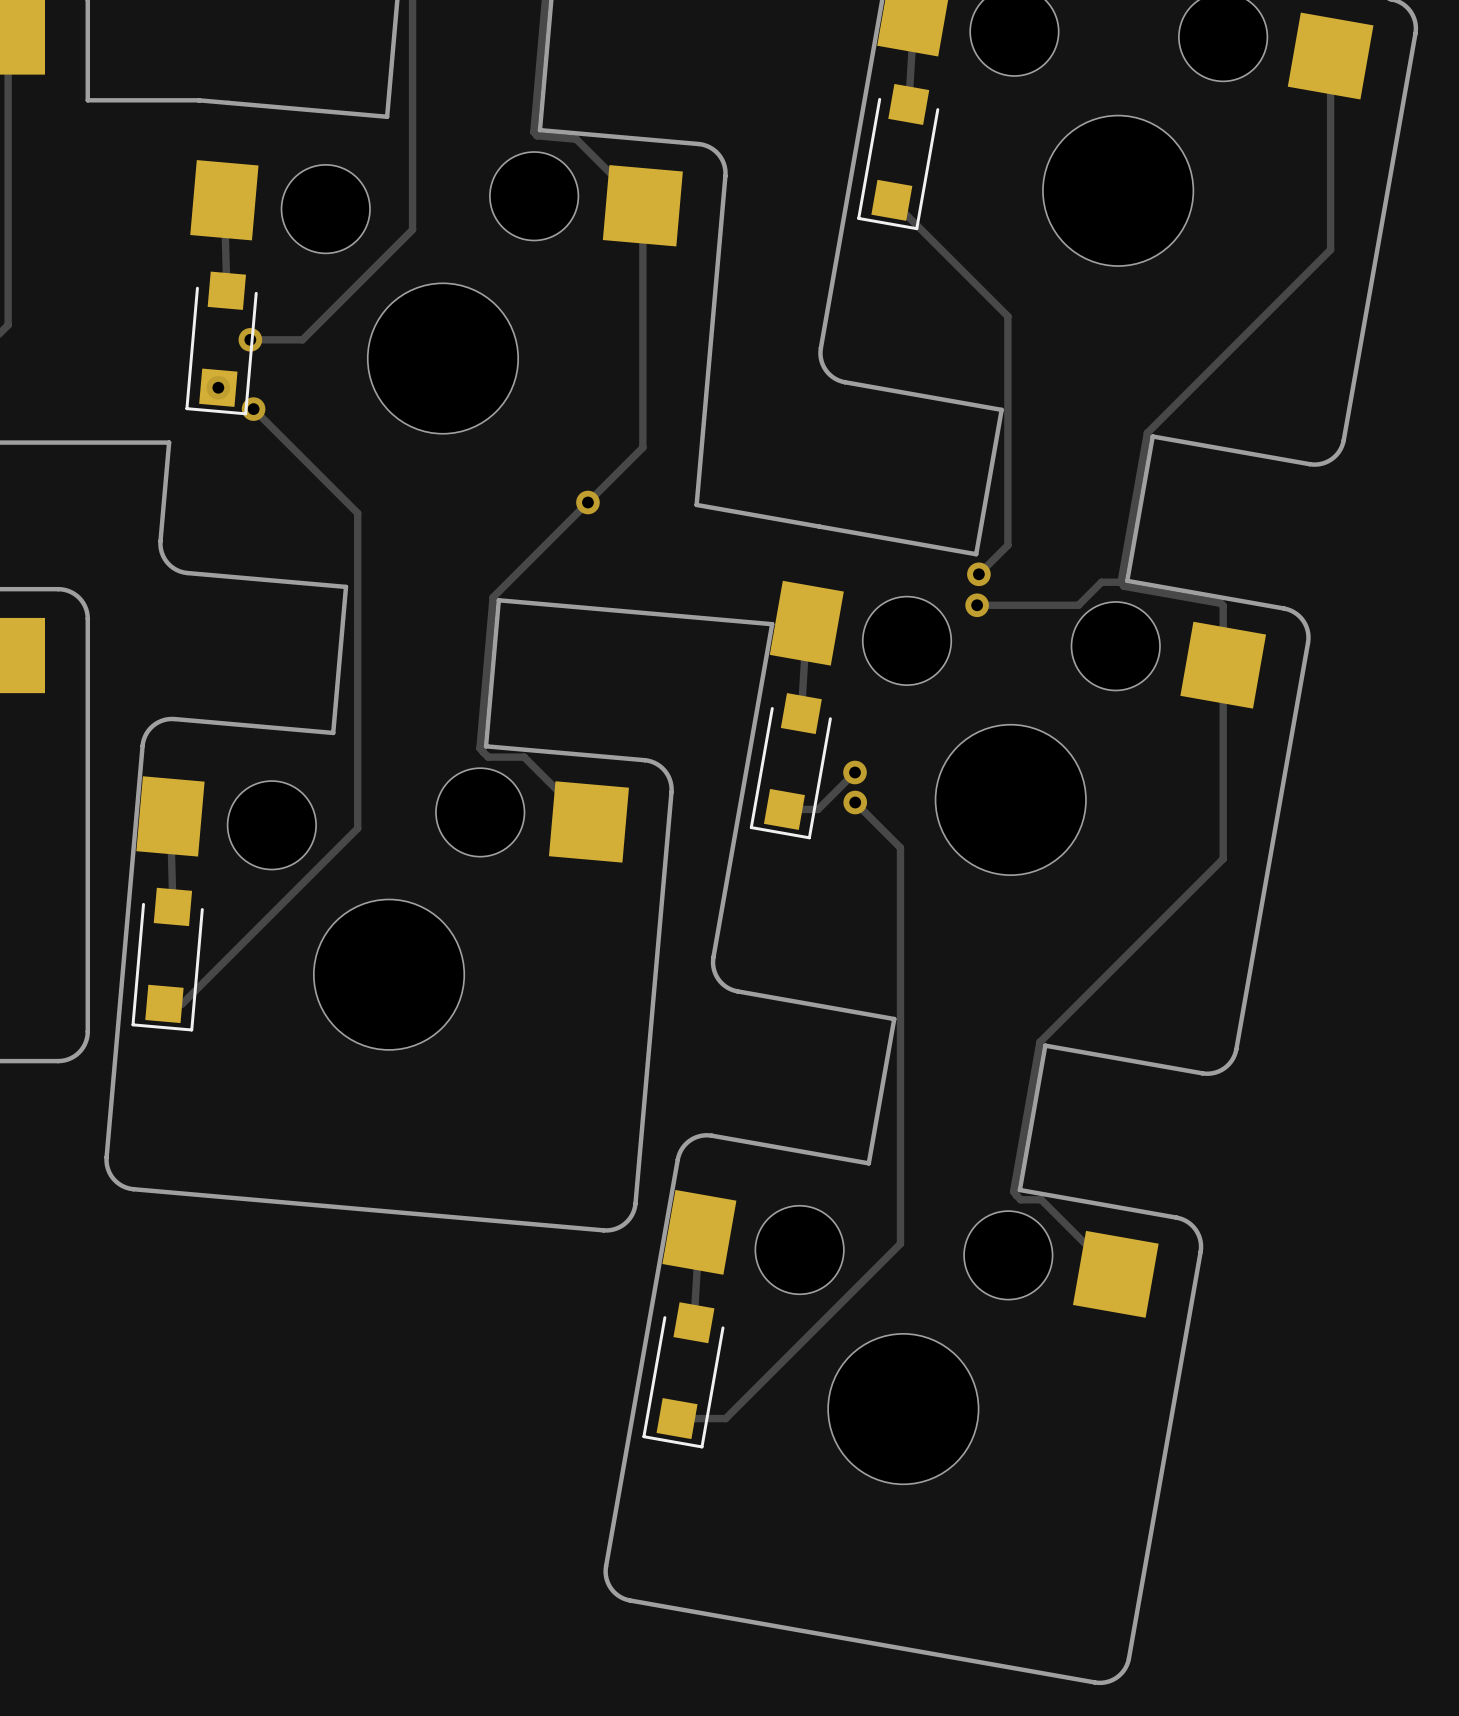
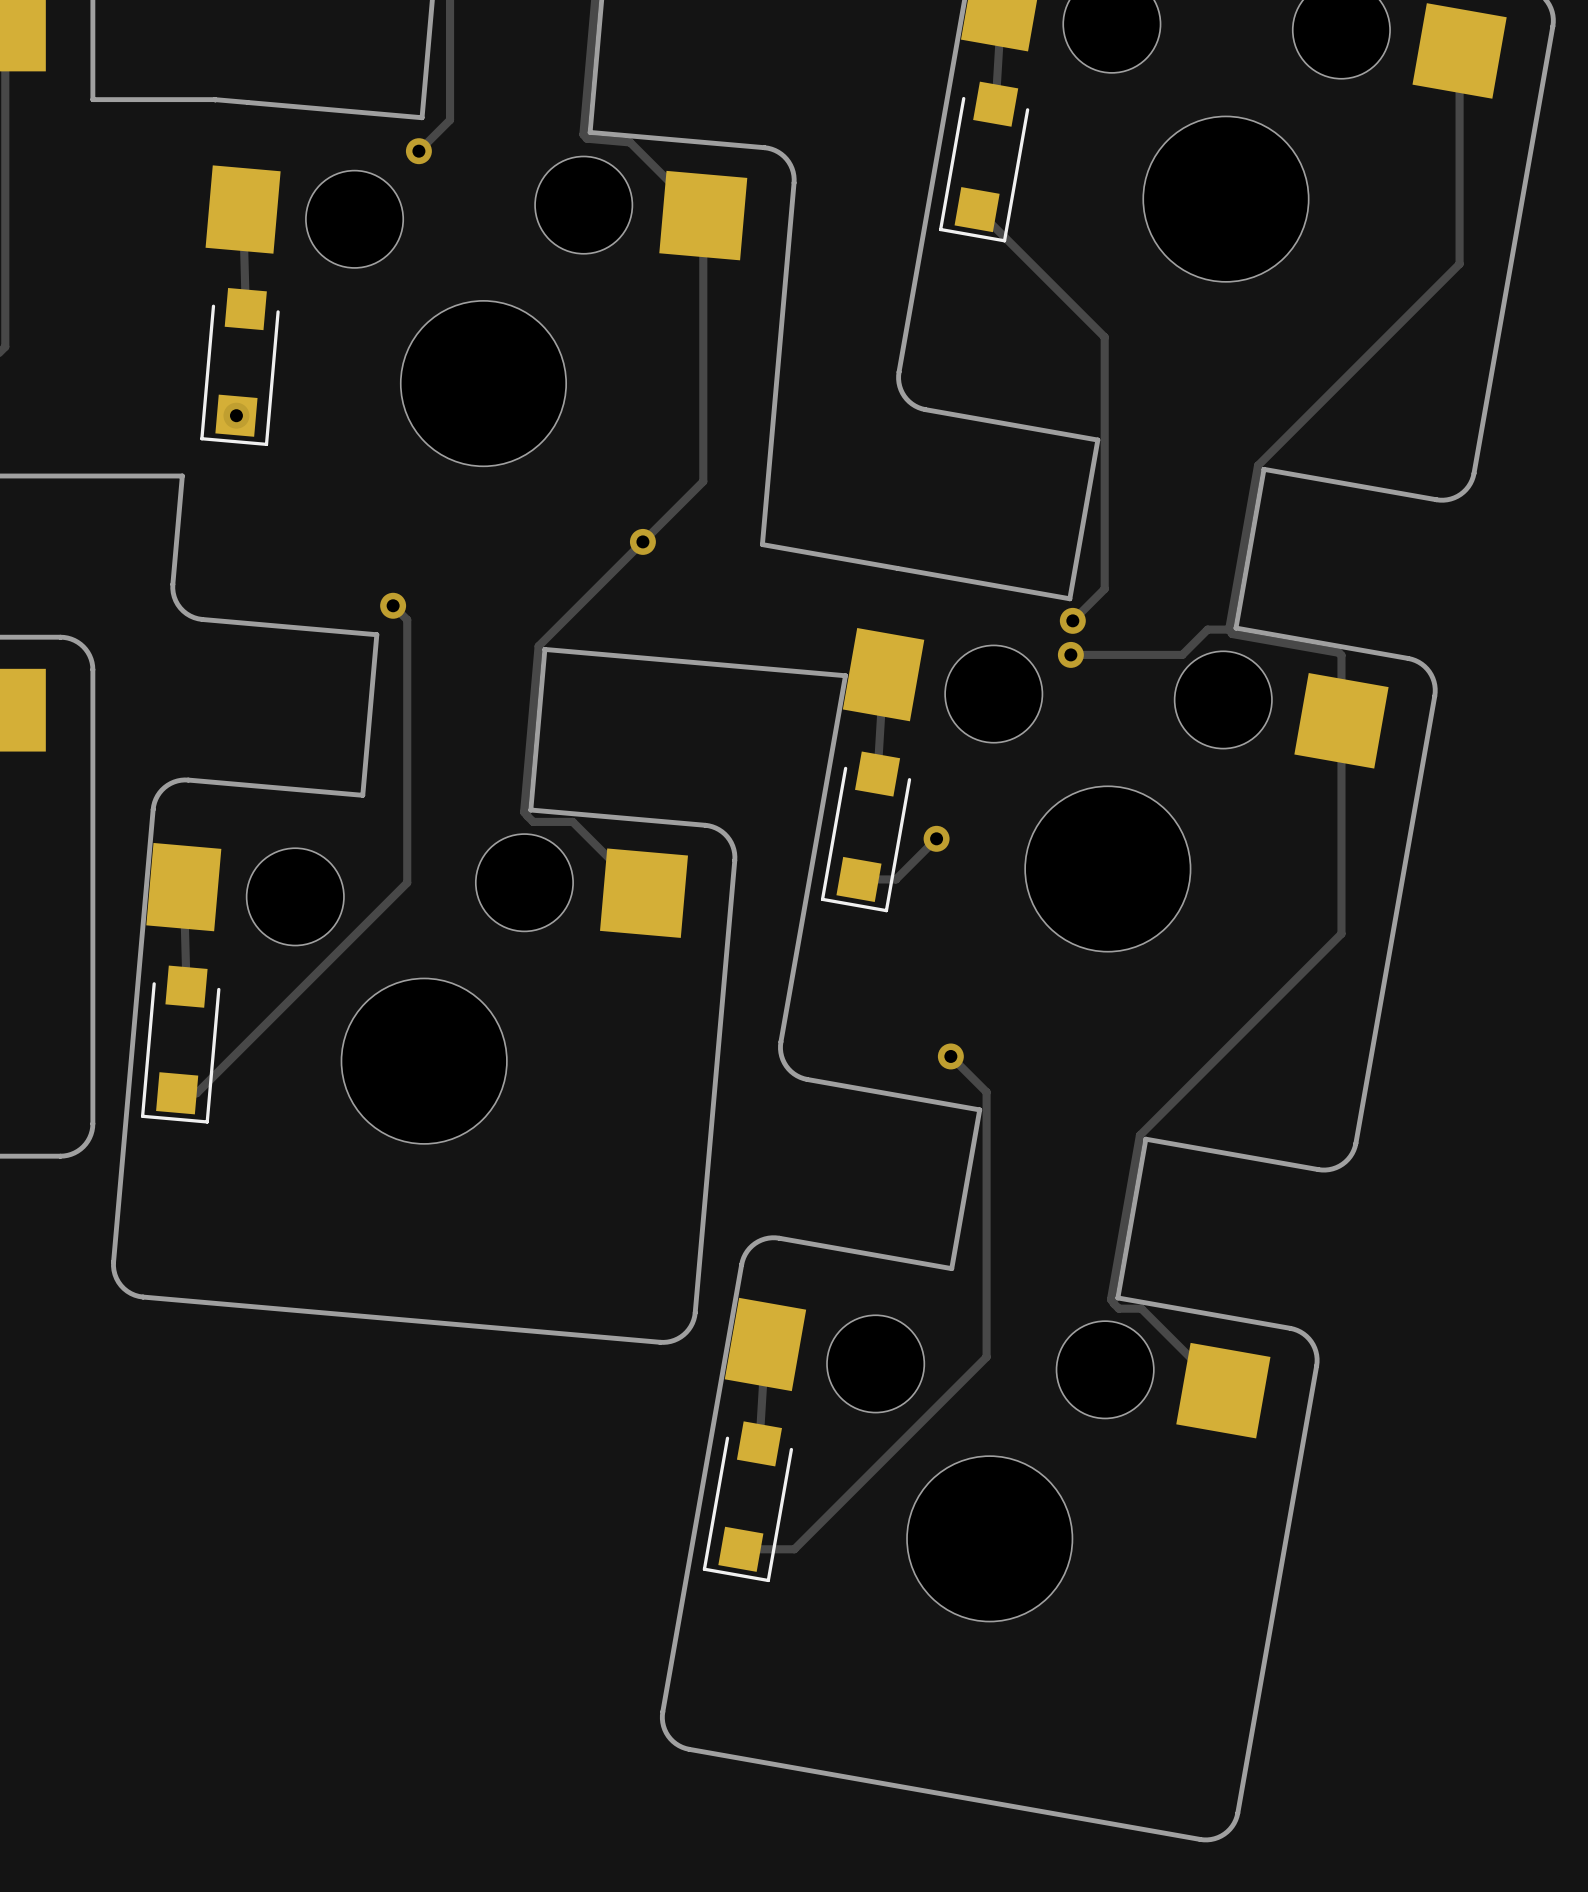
track: (412, 118) (412, 229) (302, 339) (250, 339) -> (450, 120) (418, 151)
via: none -> (418, 151)
via: (250, 339) -> none
track: (253, 409) (357, 513) (357, 828) -> (393, 605) (407, 619) (407, 882) (389, 900)
via: (253, 409) -> none
via: none -> (393, 605)
track: (855, 802) (900, 847) (900, 1002) -> (950, 1056) (986, 1092)
via position: (855, 802) -> (950, 1056)

